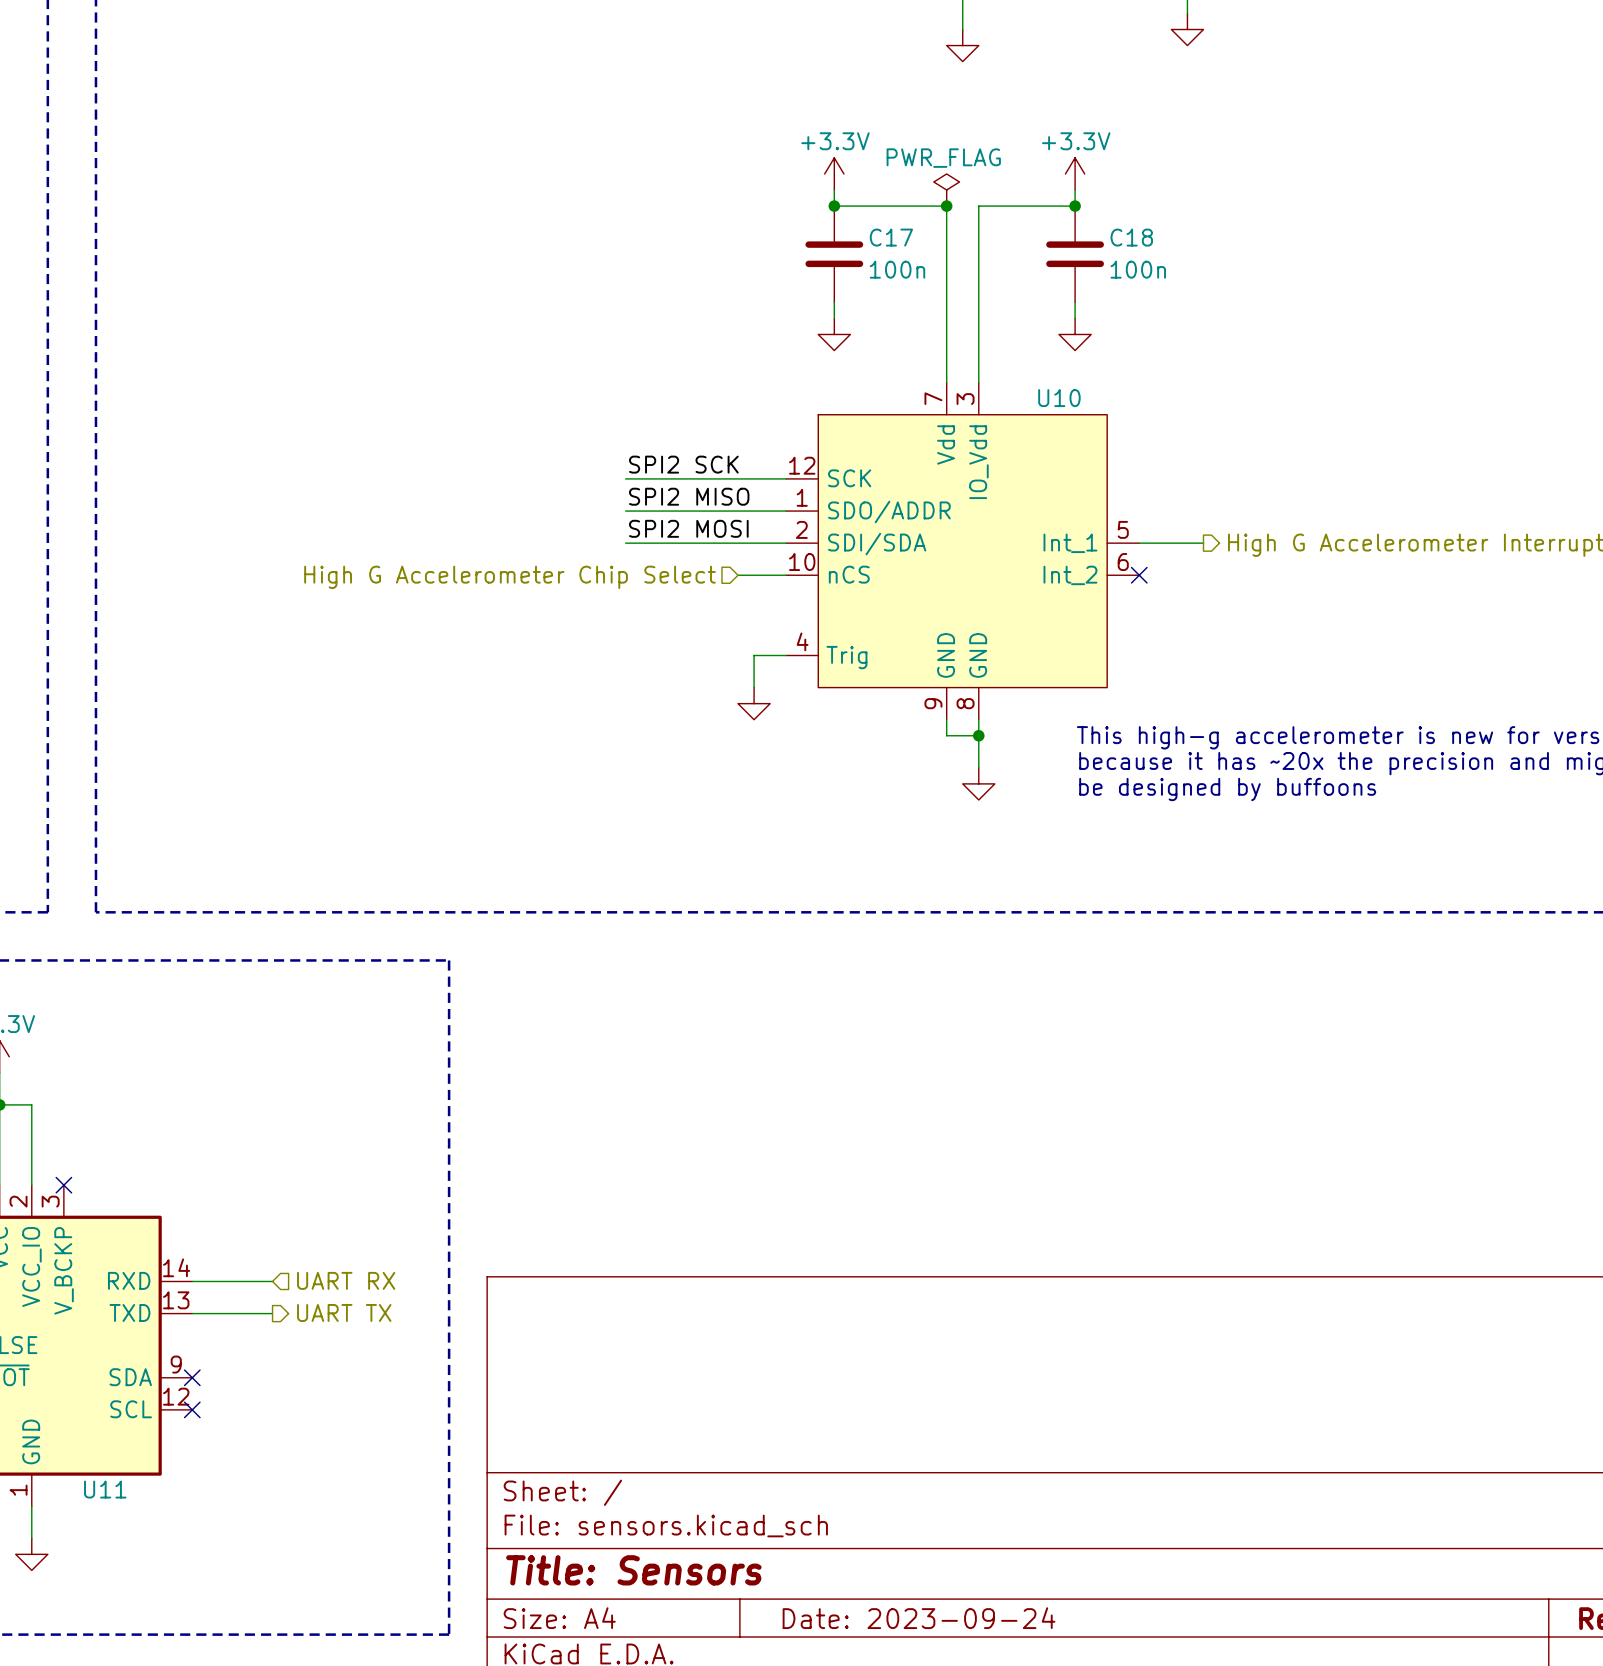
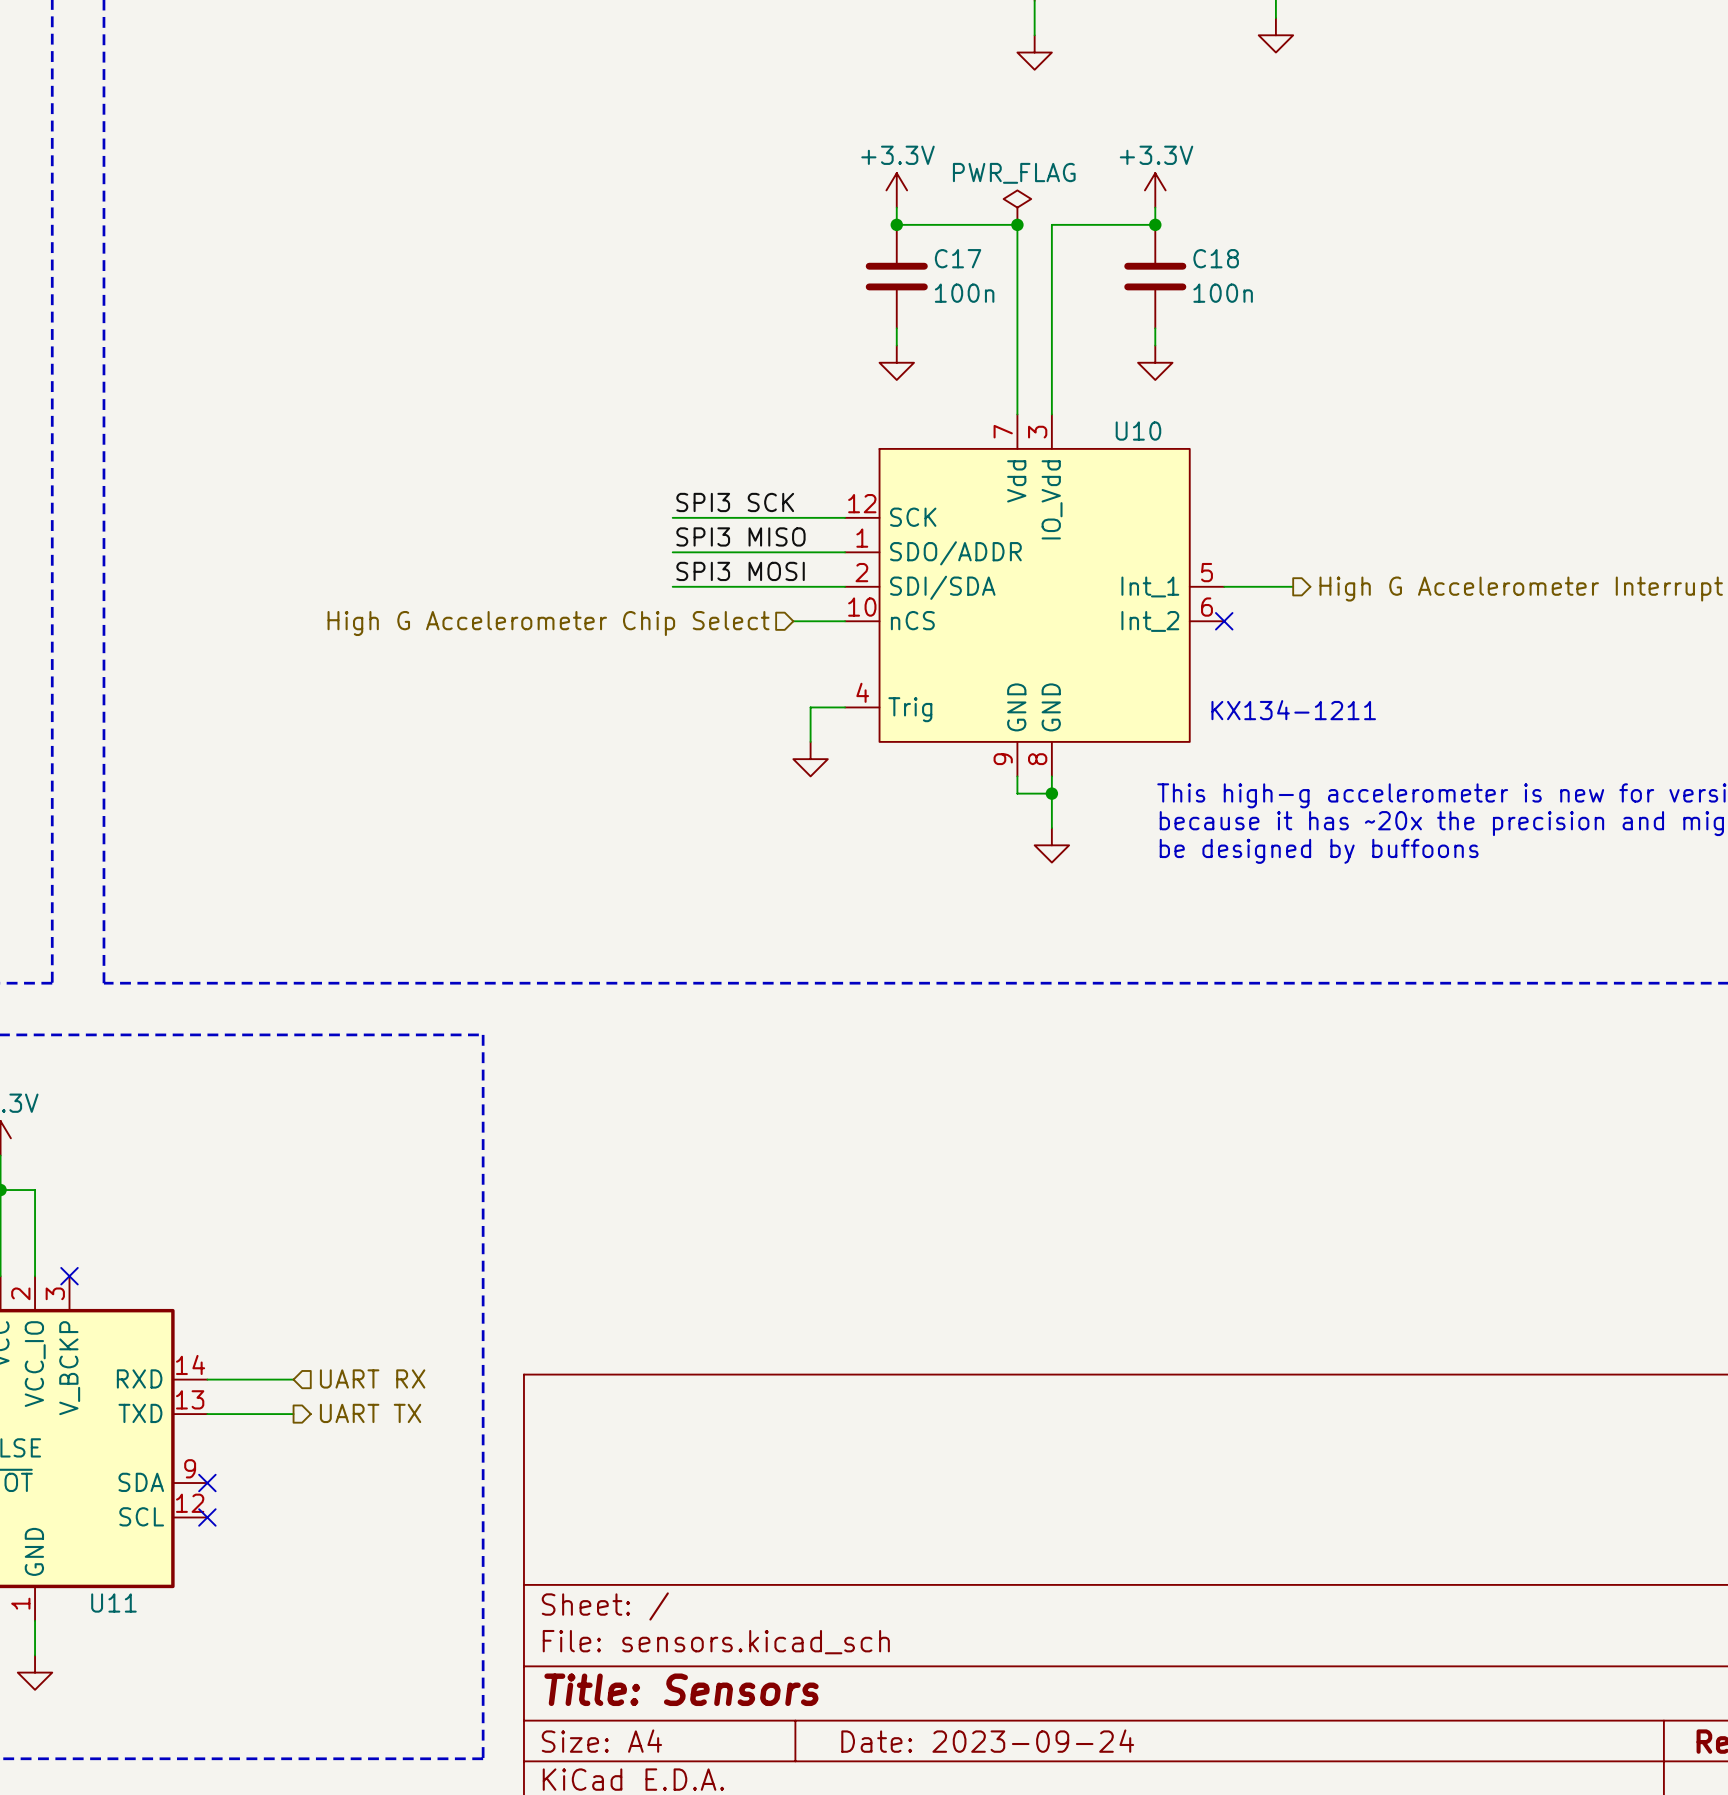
label: SPI2 SCK (683, 464) -> SPI3 SCK (735, 502)
label: SPI2 MISO (689, 496) -> SPI3 MISO (740, 536)
label: SPI2 MOSI (688, 528) -> SPI3 MOSI (740, 571)
text: none -> KX134-1211 (1293, 710)

